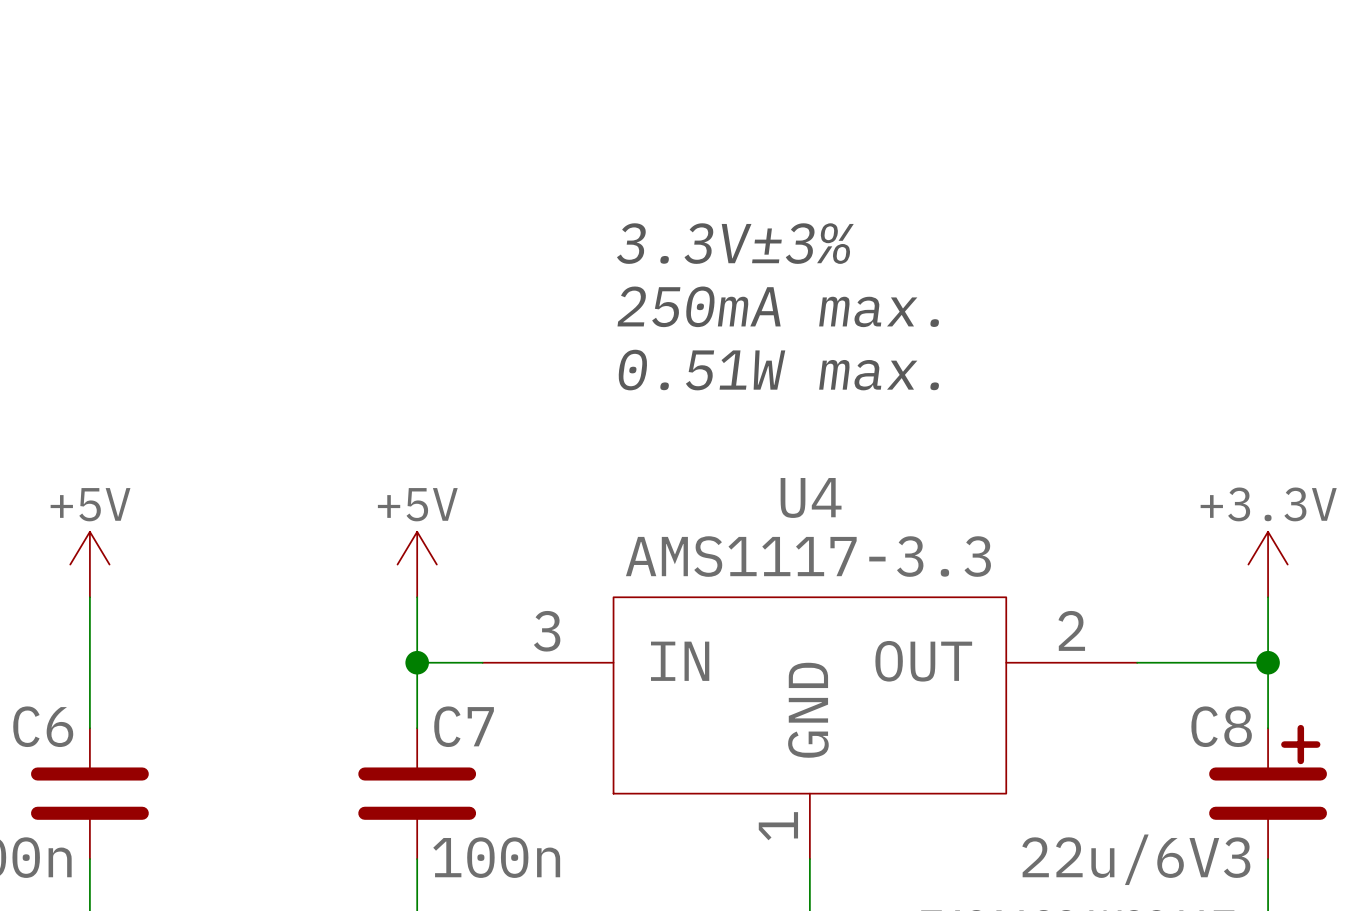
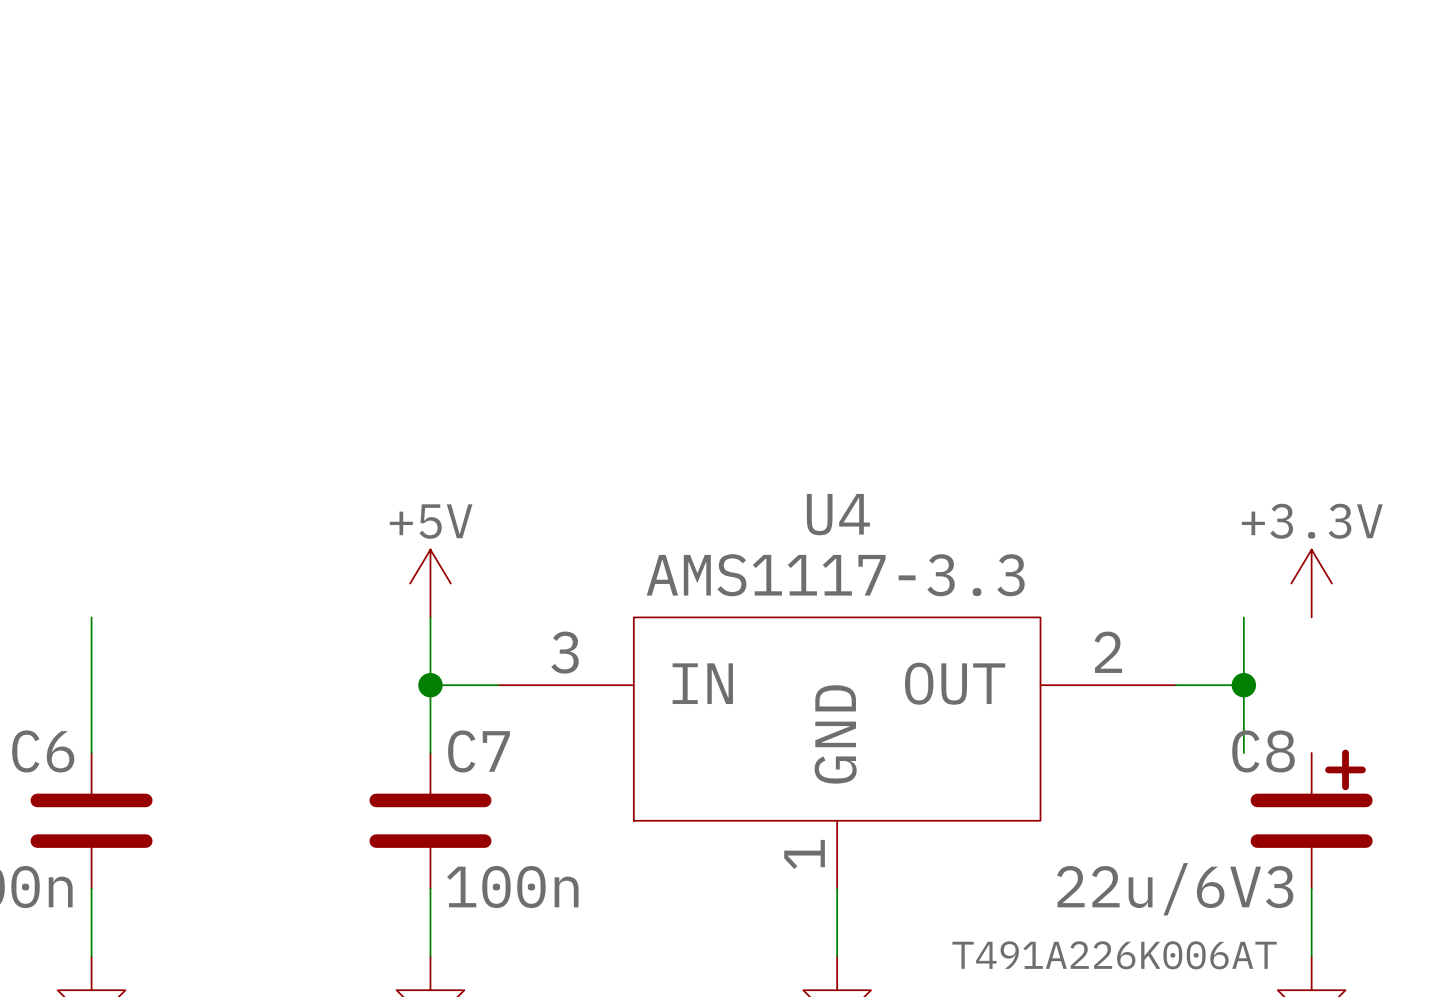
text: 3.3V±3% (735, 243) -> none
text: 250mA max. (778, 306) -> none
text: 0.51W max. (778, 370) -> none
power symbol: +5V (89, 564) -> none
wire: (1268, 597) (1268, 728) -> (1243, 617) (1243, 752)
wire: (1202, 662) (1268, 662) -> none
junction position: (1268, 662) -> (1243, 685)

